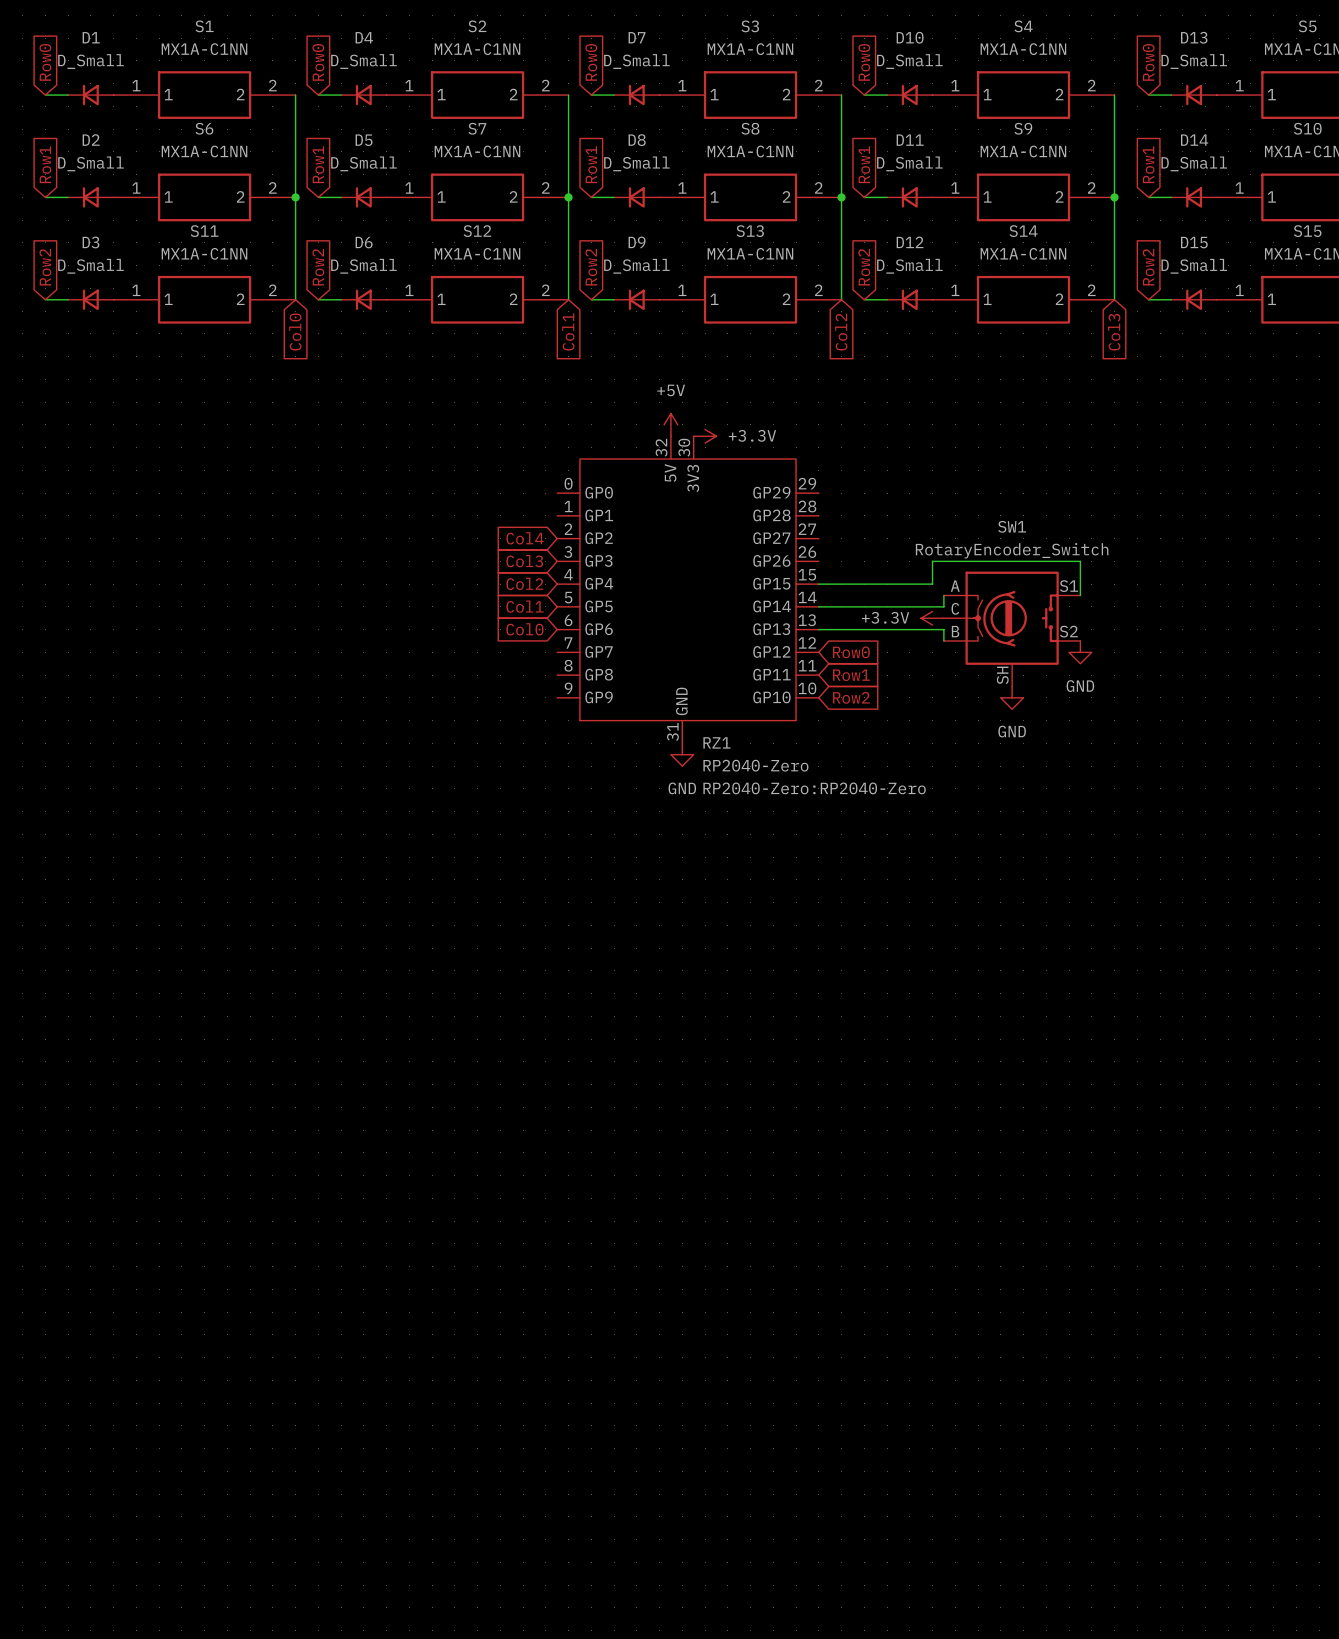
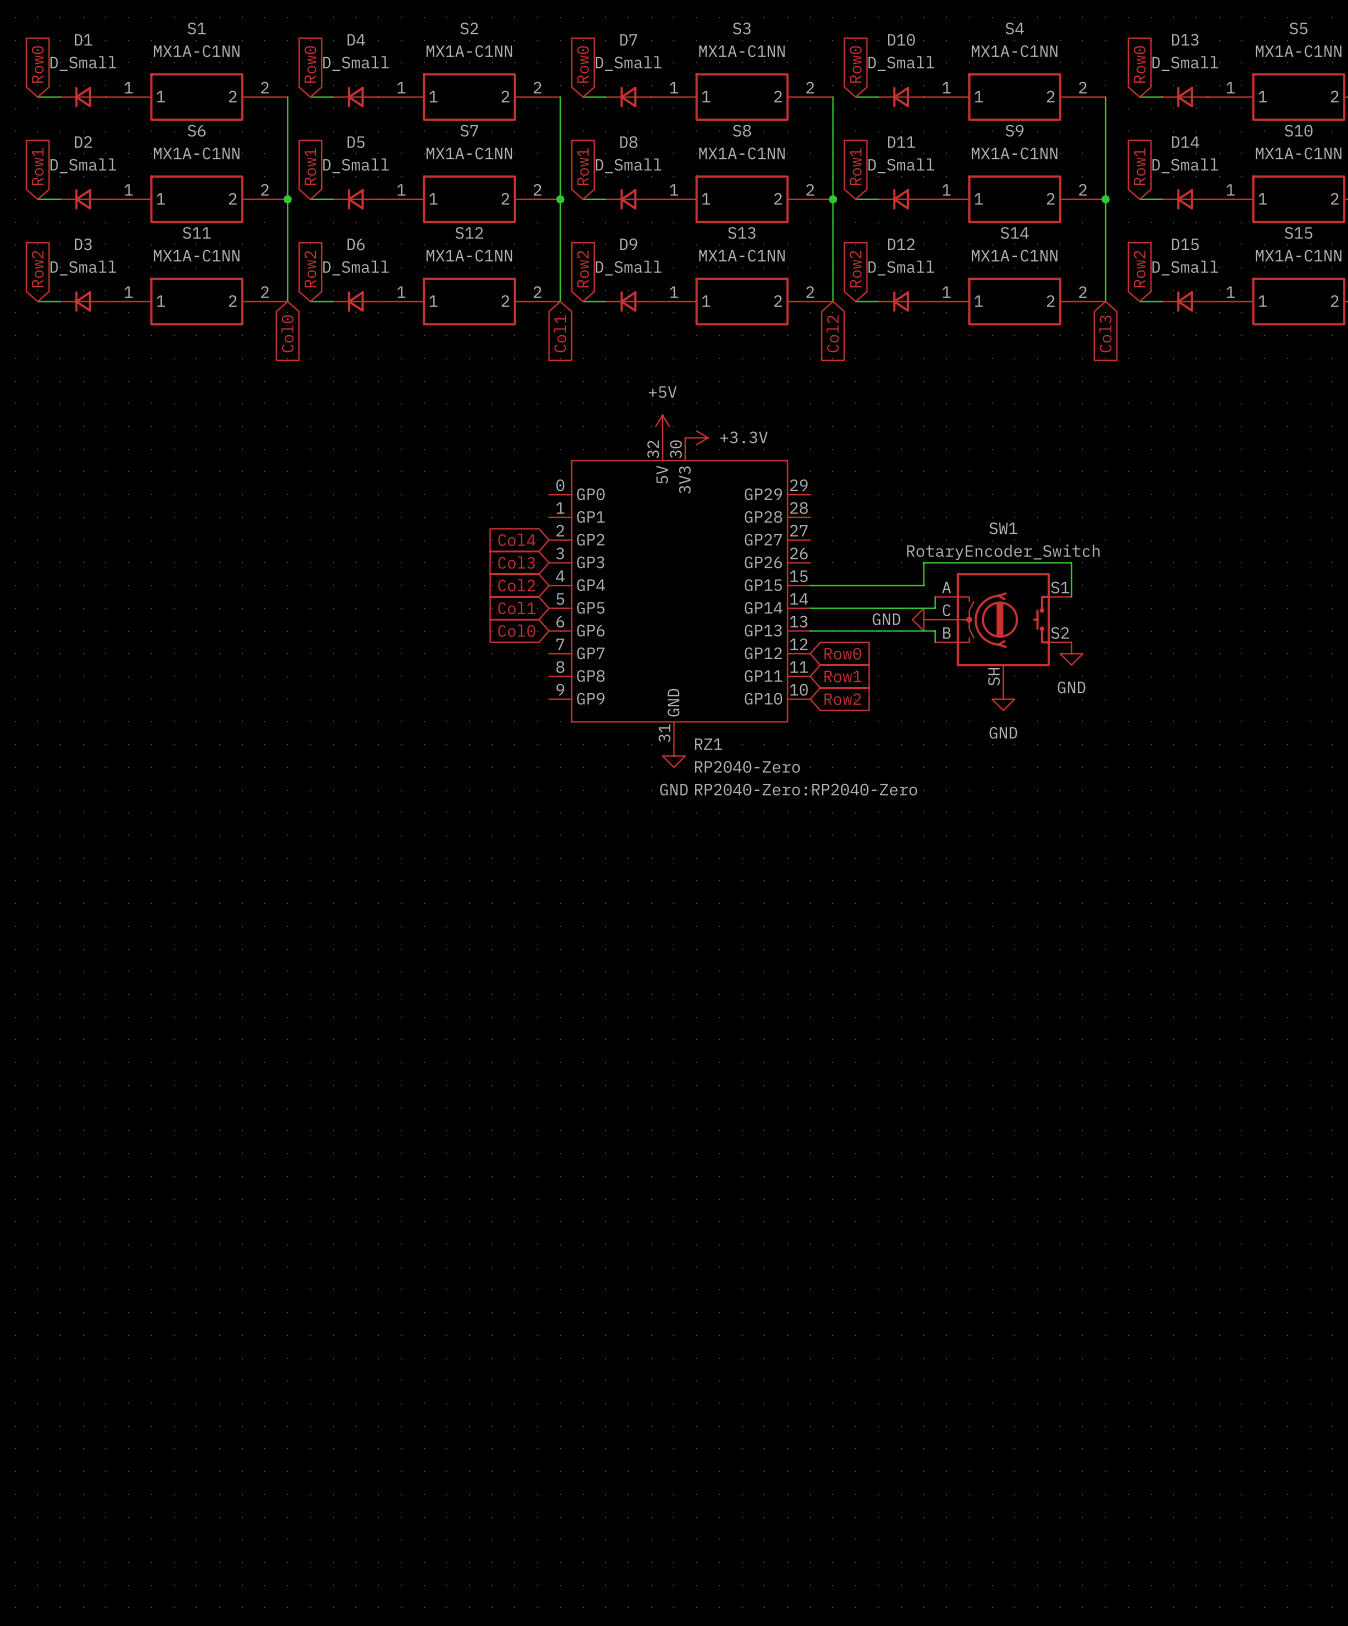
power symbol: +3.3V (932, 618) -> GND (923, 619)

